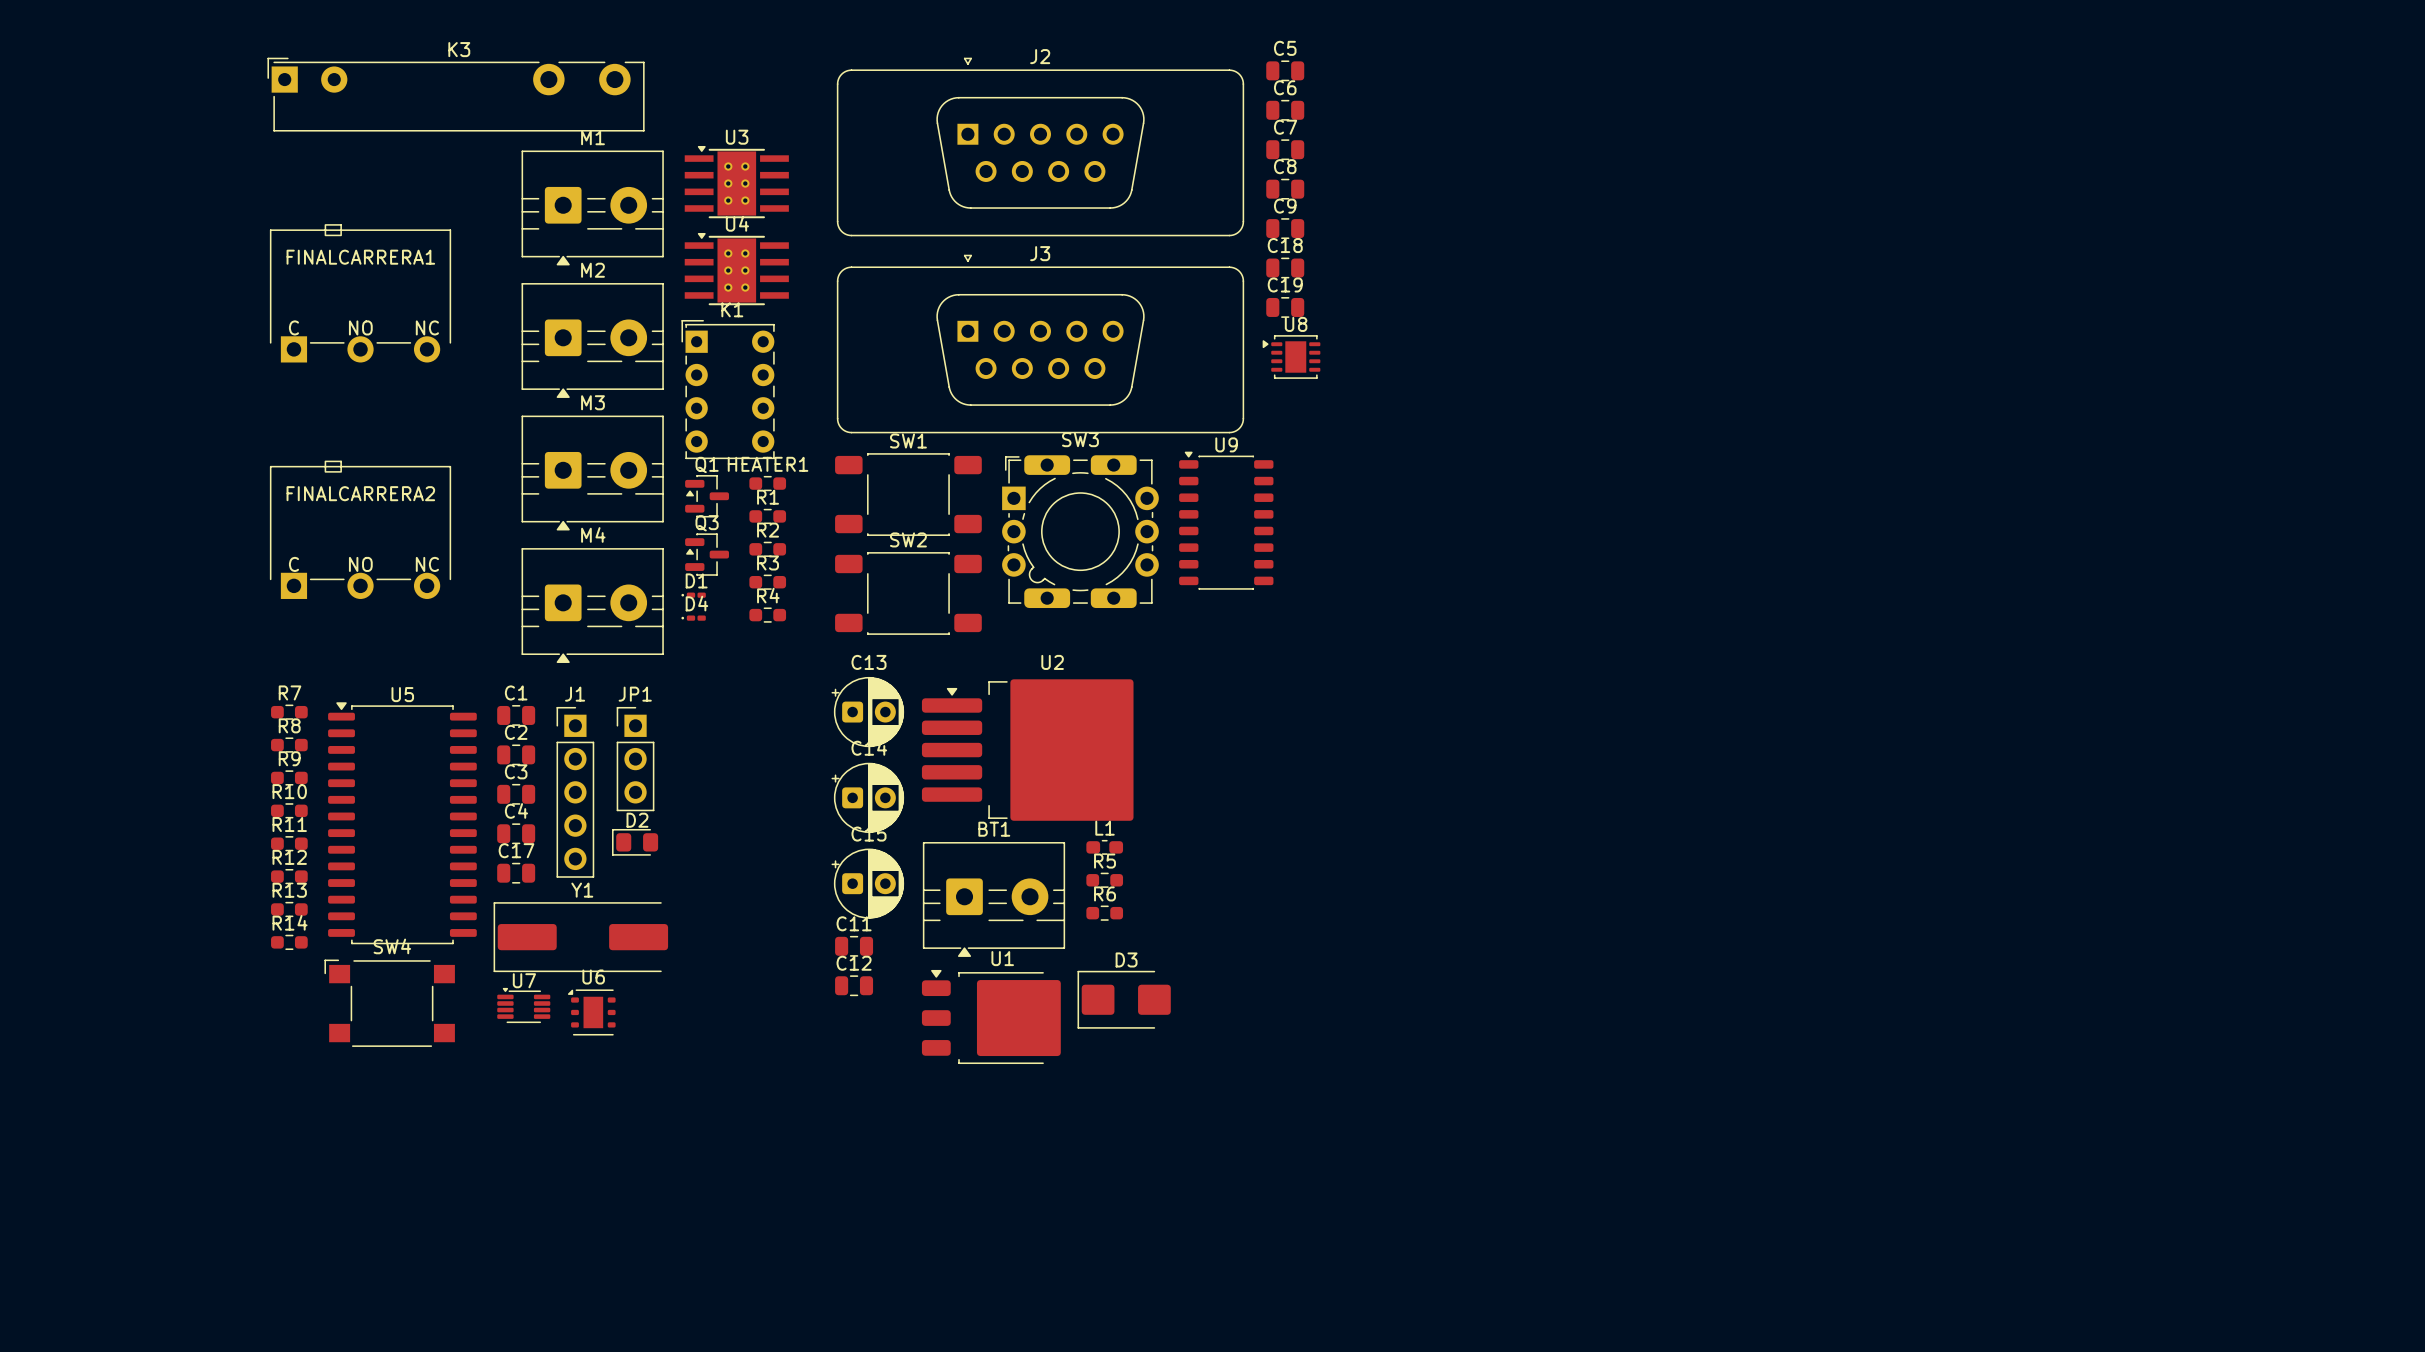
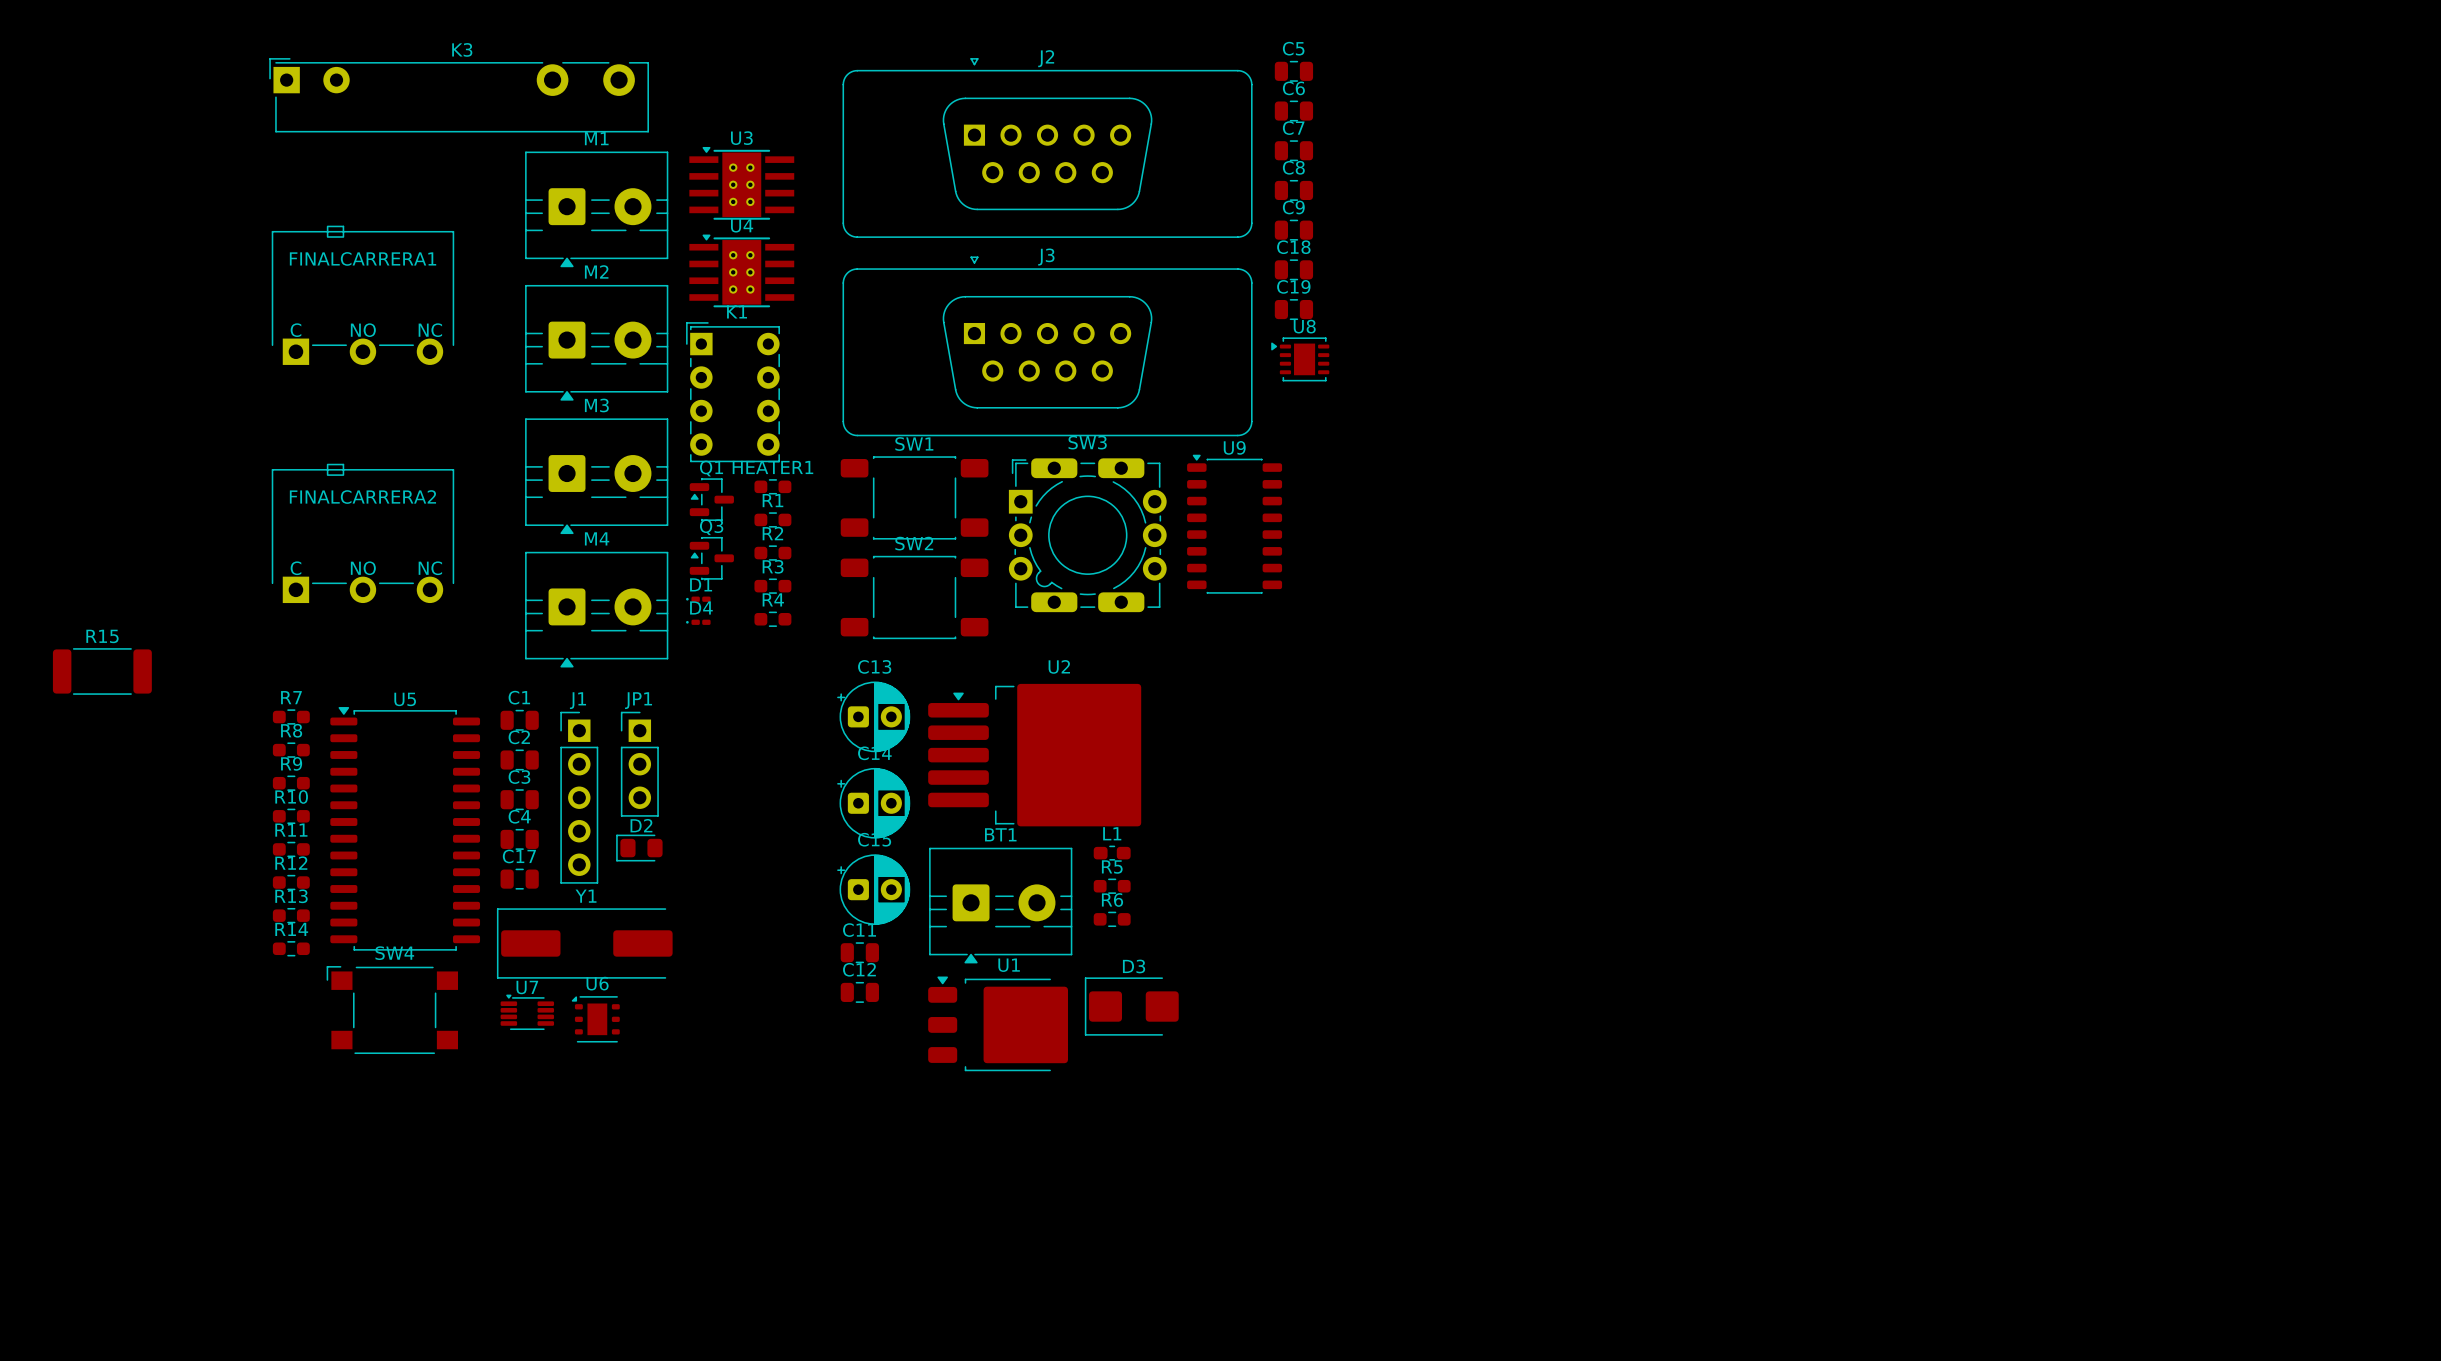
R15: none -> (102, 671)

